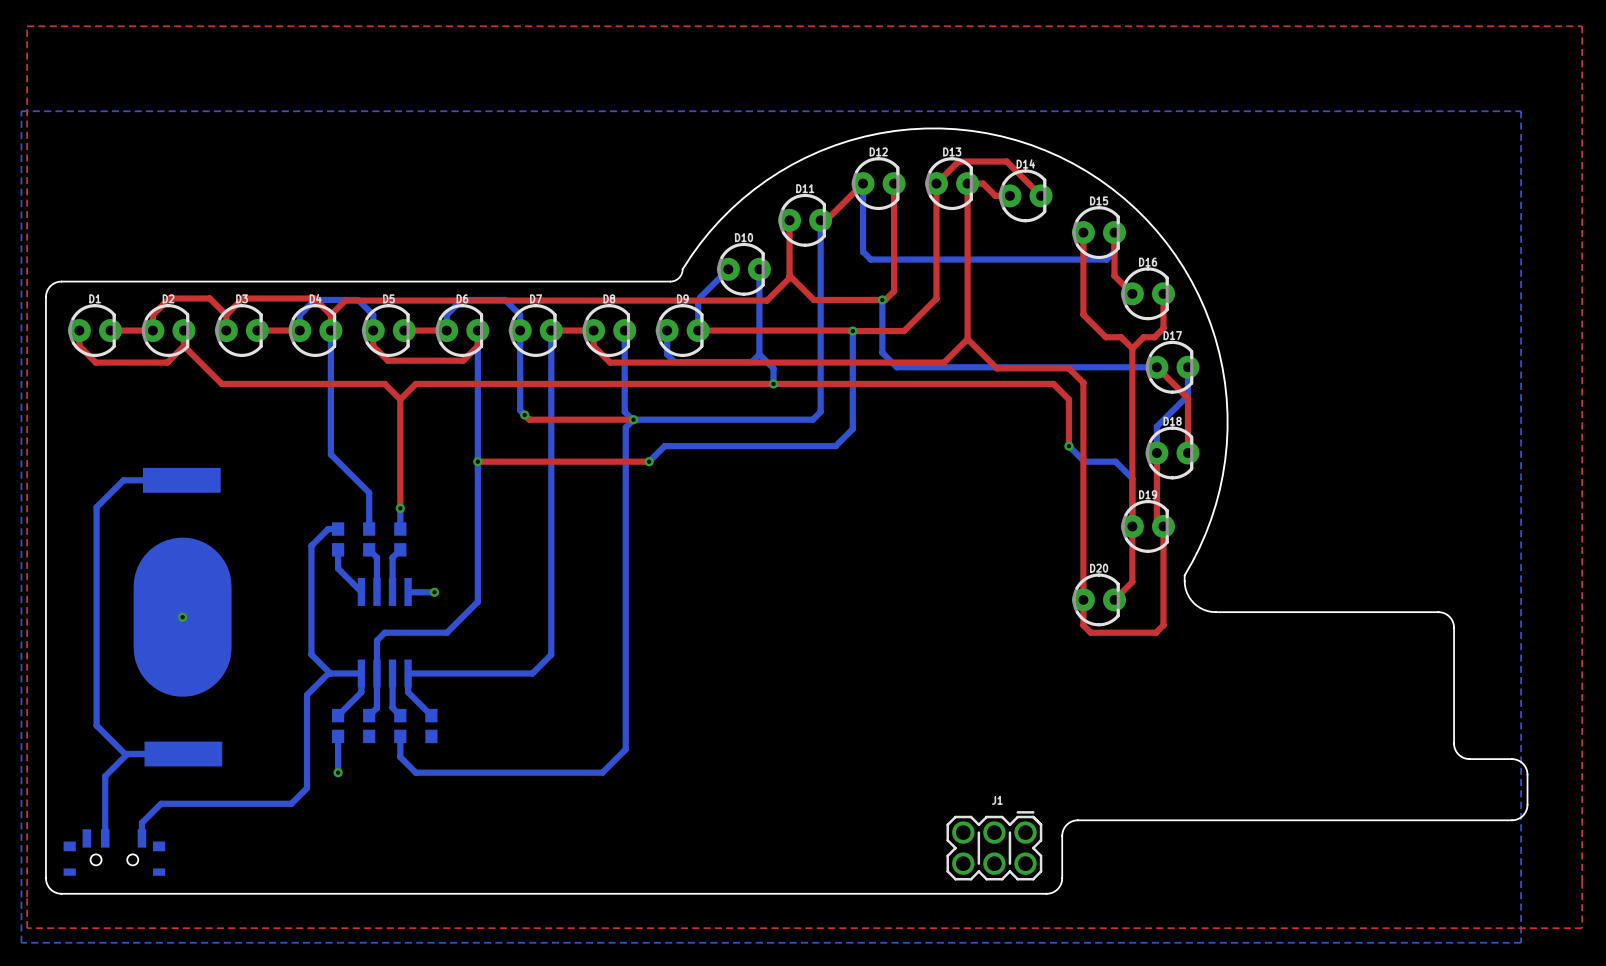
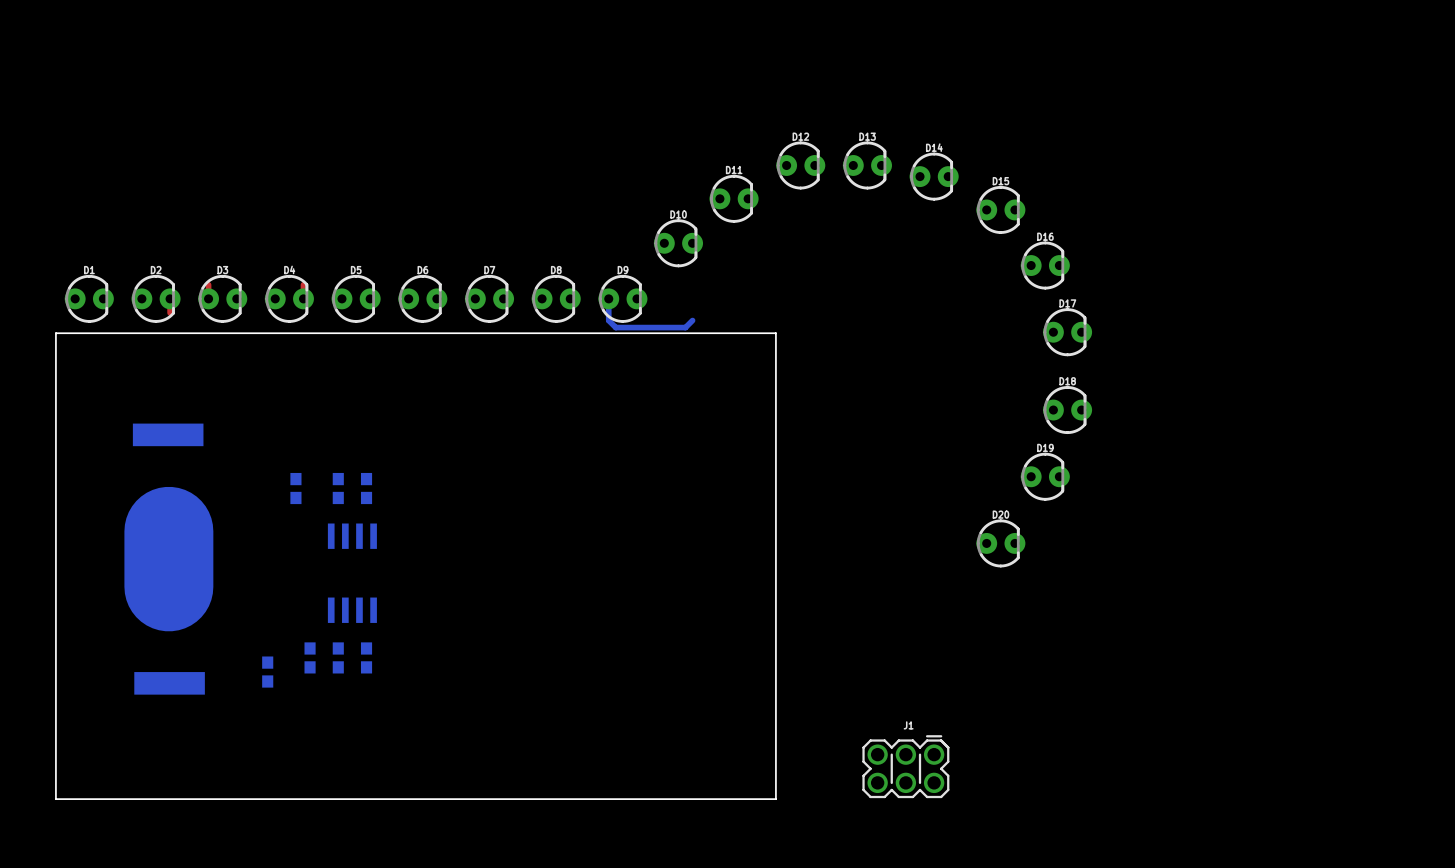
top zone outline: (27, 26) (27, 928) (1582, 928) (1582, 26) (27, 26) -> none
bottom zone outline: (21, 111) (21, 942) (1521, 942) (1521, 111) (21, 111) -> none
bottom track: (863, 183) (863, 251) (870, 259) (1106, 259) (1114, 251) (1114, 232) -> none
top track: (863, 183) (826, 220) (820, 220) -> none
top track: (894, 183) (894, 291) (885, 299) (813, 299) (789, 275) (789, 220) -> none
top track: (1009, 195) (995, 195) (983, 183) (967, 183) (967, 339) -> none
top track: (1041, 195) (1006, 161) (958, 161) (936, 183) (936, 298) (904, 331) (698, 330) -> none
bottom track: (820, 220) (820, 411) (812, 419) (632, 419) (624, 411) (624, 330) -> none
top track: (1083, 232) (1083, 314) (1105, 337) (1121, 337) (1132, 348) -> none
top track: (1114, 232) (1114, 275) (1132, 293) -> none
board edge: (682, 269) (679, 277) (670, 281) (61, 281) (50, 286) (45, 297) (45, 878) (50, 889) (61, 893) (1046, 893) (1054, 891) (1061, 884) (1062, 831) (1068, 823) (1075, 820) (1511, 820) (1519, 818) (1525, 812) (1527, 804) (1527, 774) (1522, 763) (1513, 759) (1465, 758) (1460, 755) (1455, 749) (1453, 625) (1451, 619) (1446, 614) (1438, 612) (1215, 612) (1203, 609) (1191, 599) (1185, 589) (1184, 575) (1199, 548) (1211, 519) (1219, 490) (1225, 460) (1227, 429) (1226, 398) (1219, 353) (1210, 323) (1198, 295) (1183, 268) (1166, 242) (1146, 219) (1124, 198) (1086, 171) (1059, 156) (1031, 145) (1001, 136) (971, 130) (940, 128) (909, 129) (864, 136) (834, 145) (806, 157) (779, 172) (754, 189) (730, 209) (709, 231) (682, 269) -> none
bottom track: (728, 269) (700, 297) (698, 302) (698, 330) -> none
bottom track: (759, 269) (759, 354) (773, 368) (773, 383) -> none
top track: (789, 278) (767, 300) (345, 300) (330, 314) (314, 298) (242, 298) (226, 314) (209, 298) (169, 298) (152, 314) (152, 335) -> none
top track: (1163, 293) (1163, 328) (1154, 337) (1143, 337) (1132, 348) -> none
bottom track: (882, 299) (882, 352) (896, 367) (1156, 367) -> none
via: (882, 299) -> none
top track: (79, 330) (79, 346) (95, 362) (167, 362) (183, 346) (221, 383) (384, 383) (400, 399) -> none
top track: (110, 330) (152, 330) -> none
top track: (257, 330) (299, 330) -> none
bottom track: (299, 330) (299, 314) (314, 299) (358, 299) (373, 314) (373, 330) -> none
bottom track: (330, 330) (330, 454) (369, 492) (369, 529) -> none
top track: (373, 330) (373, 346) (387, 360) (463, 360) (477, 346) (477, 330) -> none
top track: (404, 330) (446, 330) -> none
bottom track: (446, 330) (446, 314) (461, 299) (505, 299) (520, 314) (520, 410) (524, 415) -> none
bottom track: (477, 330) (477, 601) (446, 632) (384, 632) (376, 640) (376, 707) (369, 715) -> none
bottom track: (551, 330) (551, 654) (532, 673) (408, 673) (408, 692) (431, 715) -> none
top track: (551, 330) (593, 330) (593, 346) (610, 362) (944, 362) (967, 339) -> none
bottom track: (852, 331) (852, 429) (835, 446) (664, 446) (649, 461) -> none
via: (852, 331) -> none
top track: (967, 339) (996, 368) (1068, 368) (1083, 382) (1083, 625) (1090, 632) (1156, 632) (1163, 625) (1163, 526) (1156, 519) (1156, 452) -> none
top track: (1132, 348) (1132, 582) (1114, 599) -> none
top track: (1156, 367) (1187, 398) (1187, 452) -> none
bottom track: (1187, 367) (1187, 395) (1156, 426) (1156, 452) -> none
board edge: none -> (55, 333) (775, 333) (775, 799) (55, 799) (55, 333)
via: (773, 383) -> none
top track: (400, 399) (400, 508) -> none
top track: (400, 399) (415, 383) (1053, 383) (1068, 399) (1068, 446) -> none
top track: (524, 415) (529, 419) (633, 419) -> none
via: (524, 415) -> none
bottom track: (633, 419) (625, 427) (625, 749) (602, 772) (415, 772) (400, 757) (400, 736) -> none
via: (633, 419) -> none
bottom track: (1068, 446) (1084, 461) (1115, 461) (1132, 478) (1132, 526) -> none
via: (1068, 446) -> none
top track: (477, 461) (649, 461) -> none
via: (477, 461) -> none
via: (649, 461) -> none
bottom track: (201, 480) (123, 480) (96, 507) (96, 725) (125, 754) (202, 754) -> none
bottom track: (400, 508) (400, 529) -> none
via: (400, 508) -> none
bottom track: (338, 529) (328, 529) (311, 545) (311, 654) (330, 673) -> none
part position: (338, 539) -> (295, 488)
bottom track: (338, 549) (338, 568) (361, 591) -> none
bottom track: (369, 549) (376, 557) (376, 591) -> none
bottom track: (400, 549) (392, 557) (392, 591) -> none
bottom track: (409, 592) (434, 592) -> none
via: (434, 592) -> none
via: (182, 617) -> none
bottom track: (392, 673) (392, 707) (400, 715) -> none
bottom track: (338, 715) (361, 692) (361, 673) (328, 673) (307, 694) (307, 788) (291, 803) (161, 803) (141, 822) (141, 838) -> none
part: (431, 726) -> none
bottom track: (338, 736) (338, 772) -> none
part: none -> (267, 672)
bottom track: (127, 754) (105, 776) (105, 838) -> none
via: (338, 772) -> none
part: (114, 852) -> none

